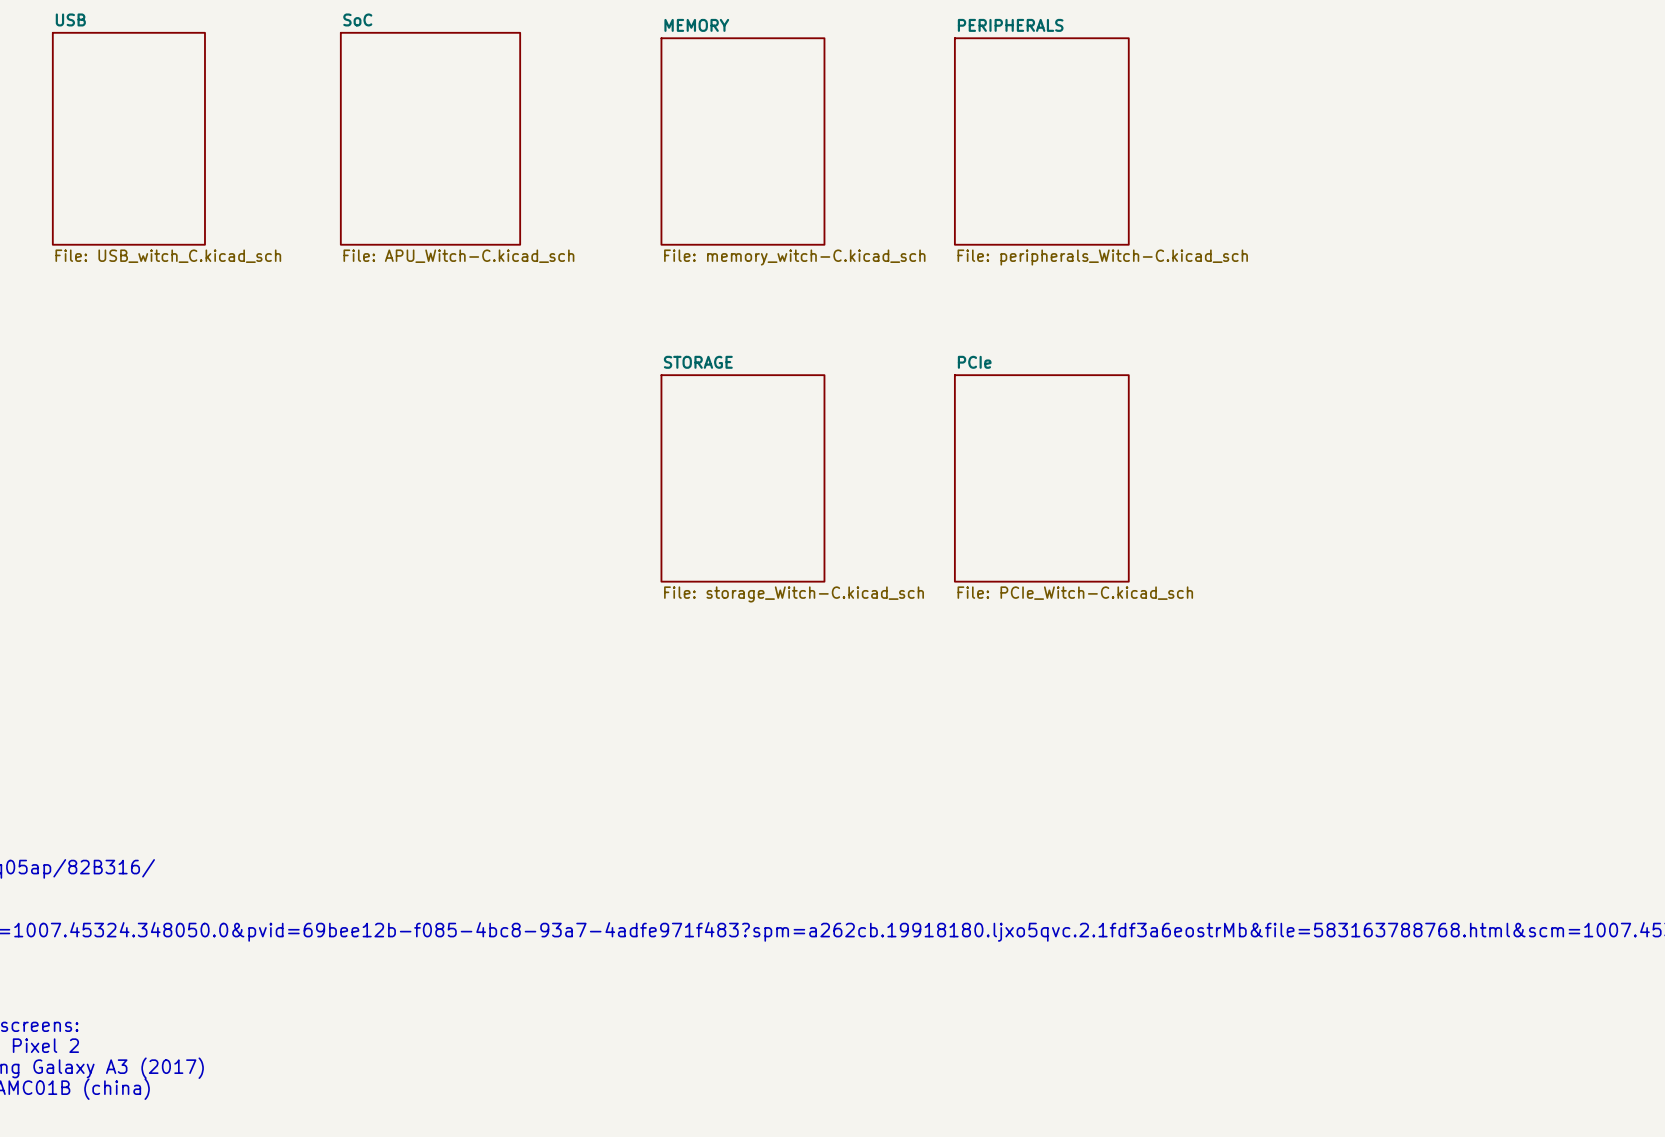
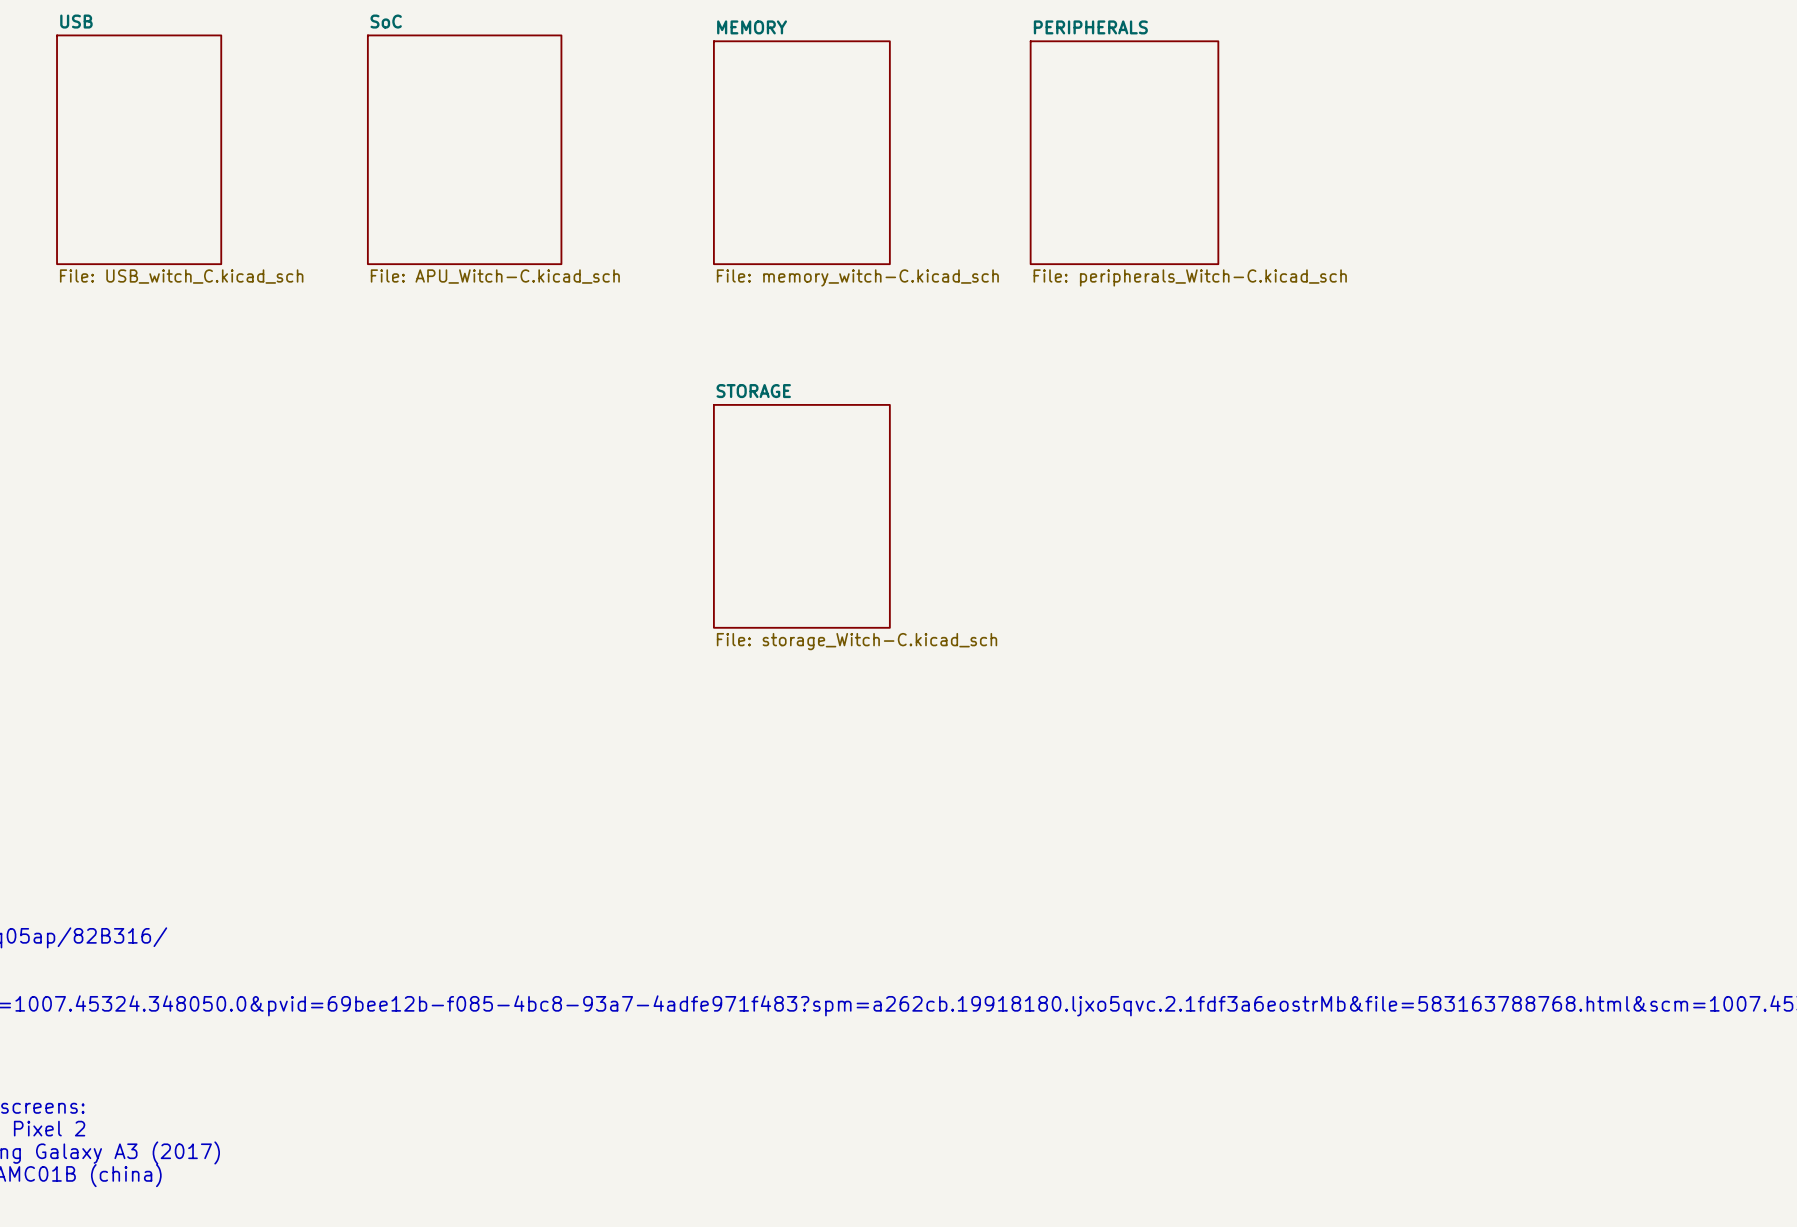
sheet PCIe: File: PCIe_Witch-C.kicad_sch (1041, 478) -> none

